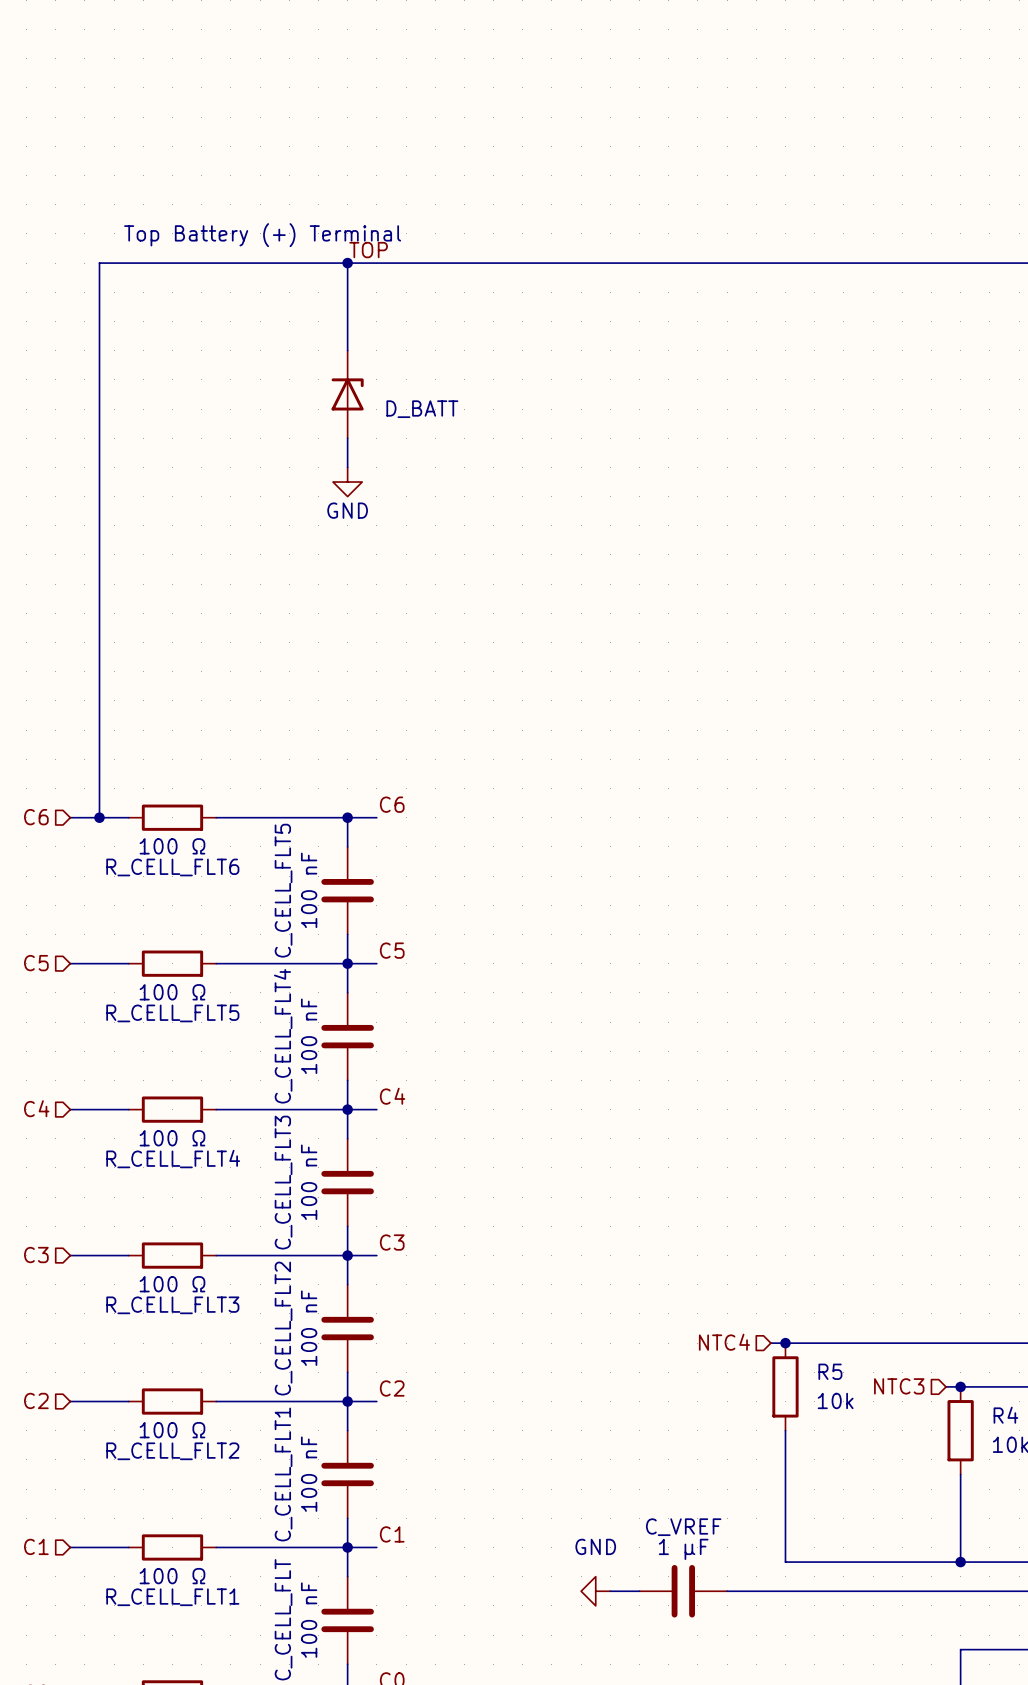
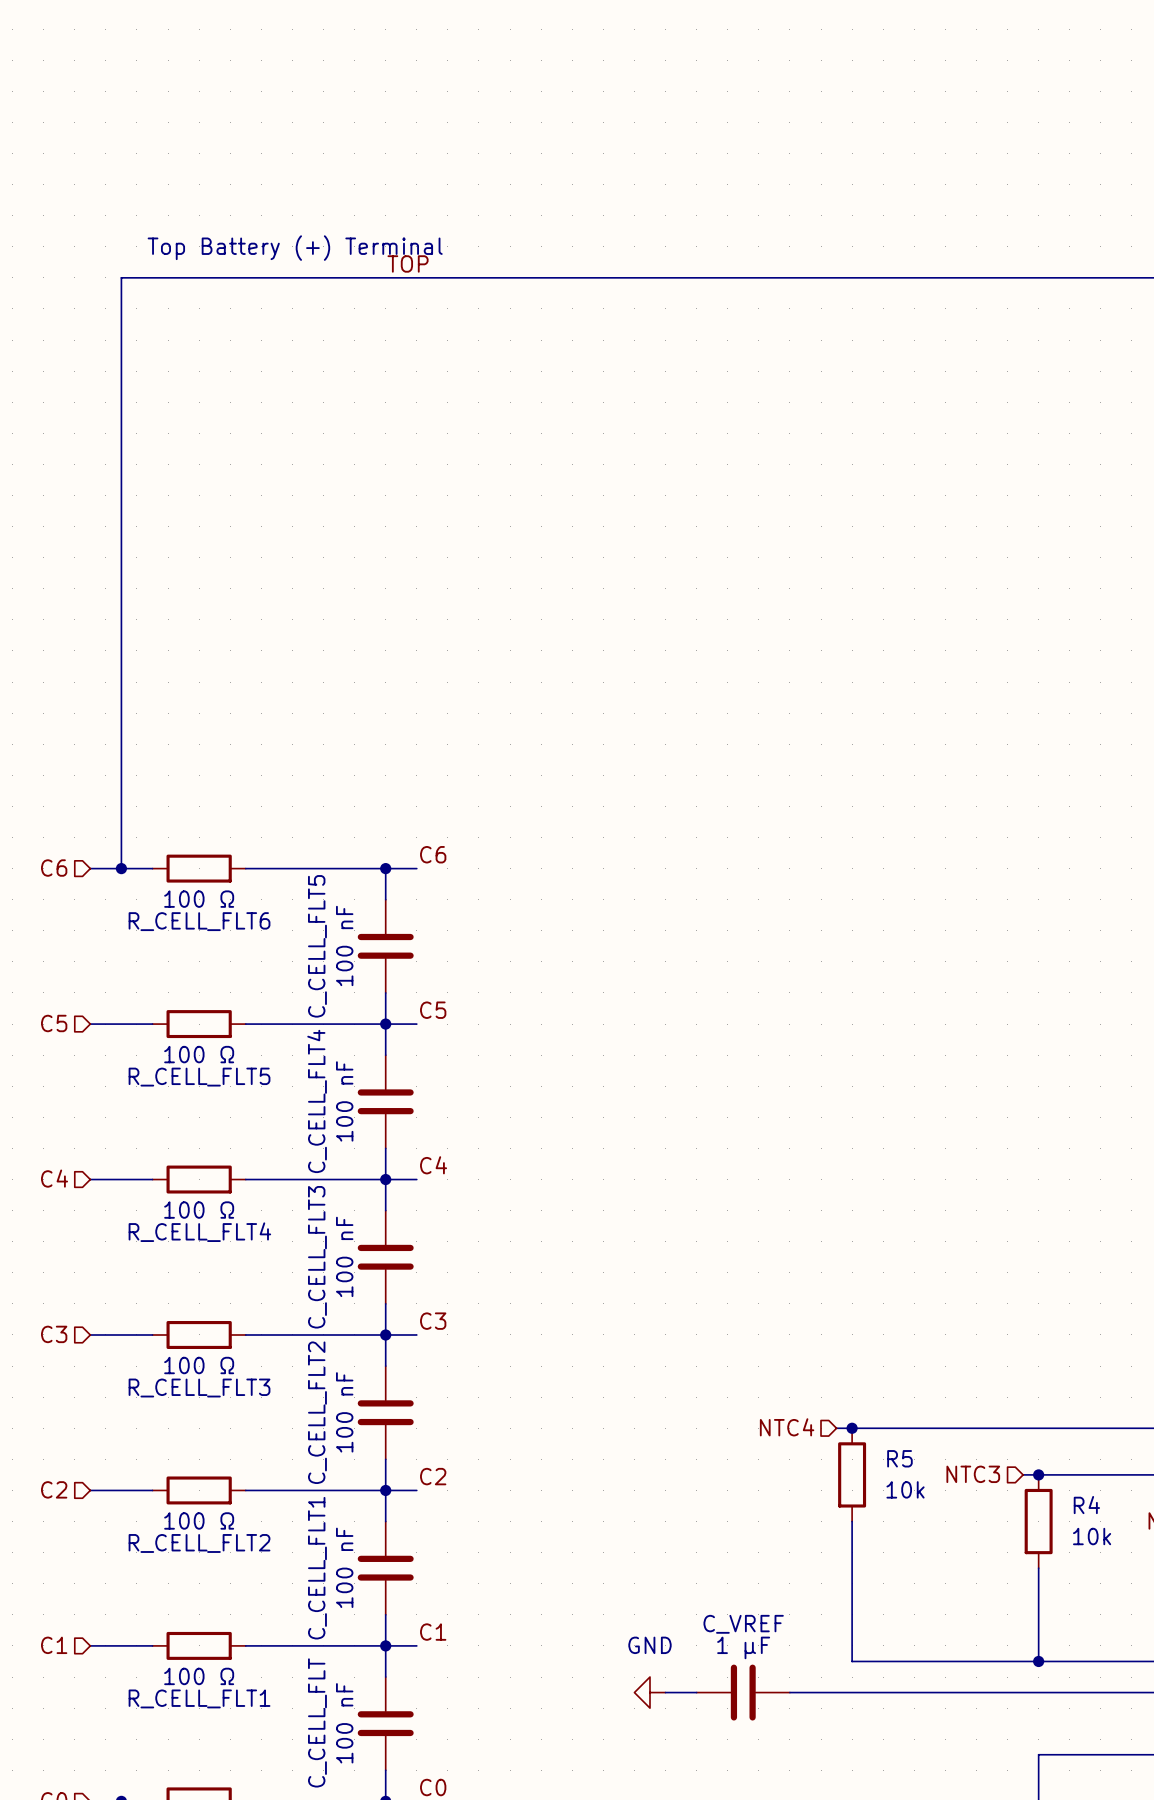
wire: (347, 263) (347, 350) -> none
junction: (347, 263) -> none
D_BATT: (347, 394) -> none
wire: (347, 438) (347, 467) -> none
power symbol: GND (347, 482) -> none

